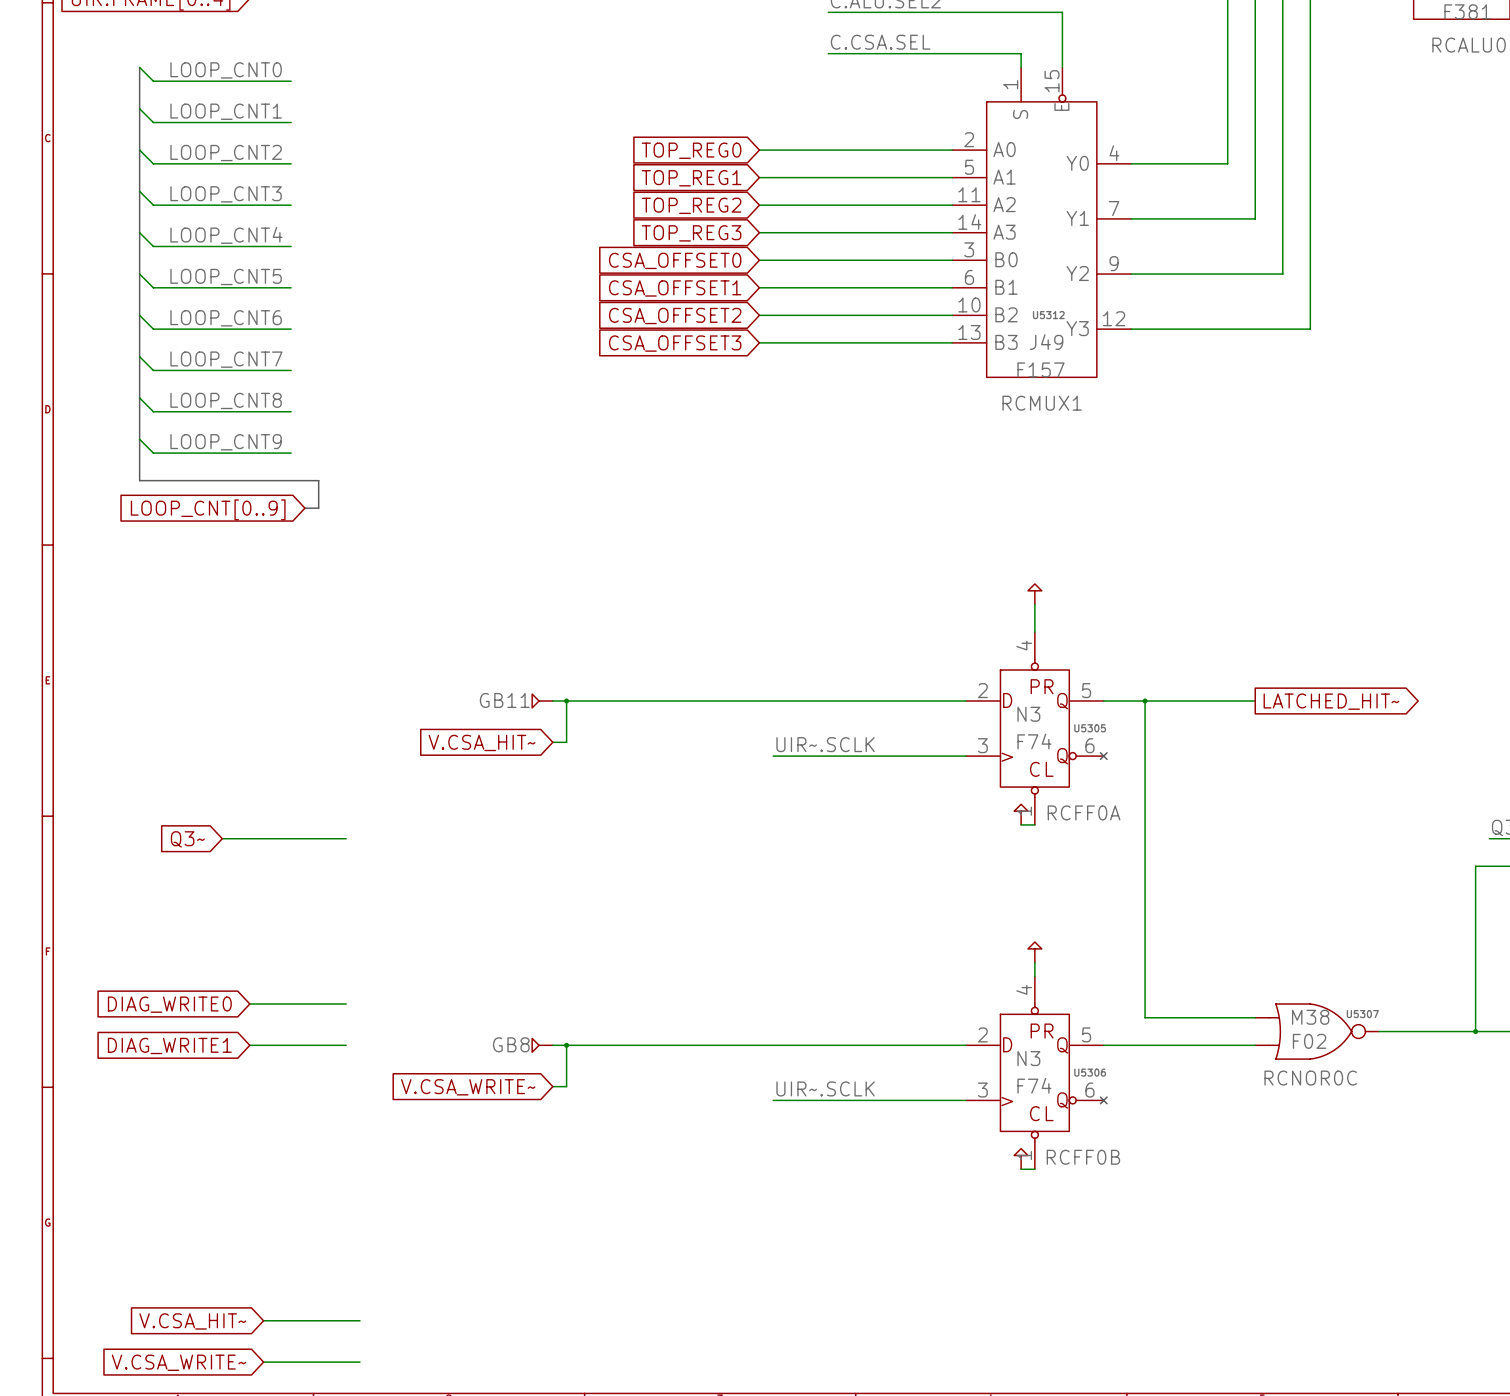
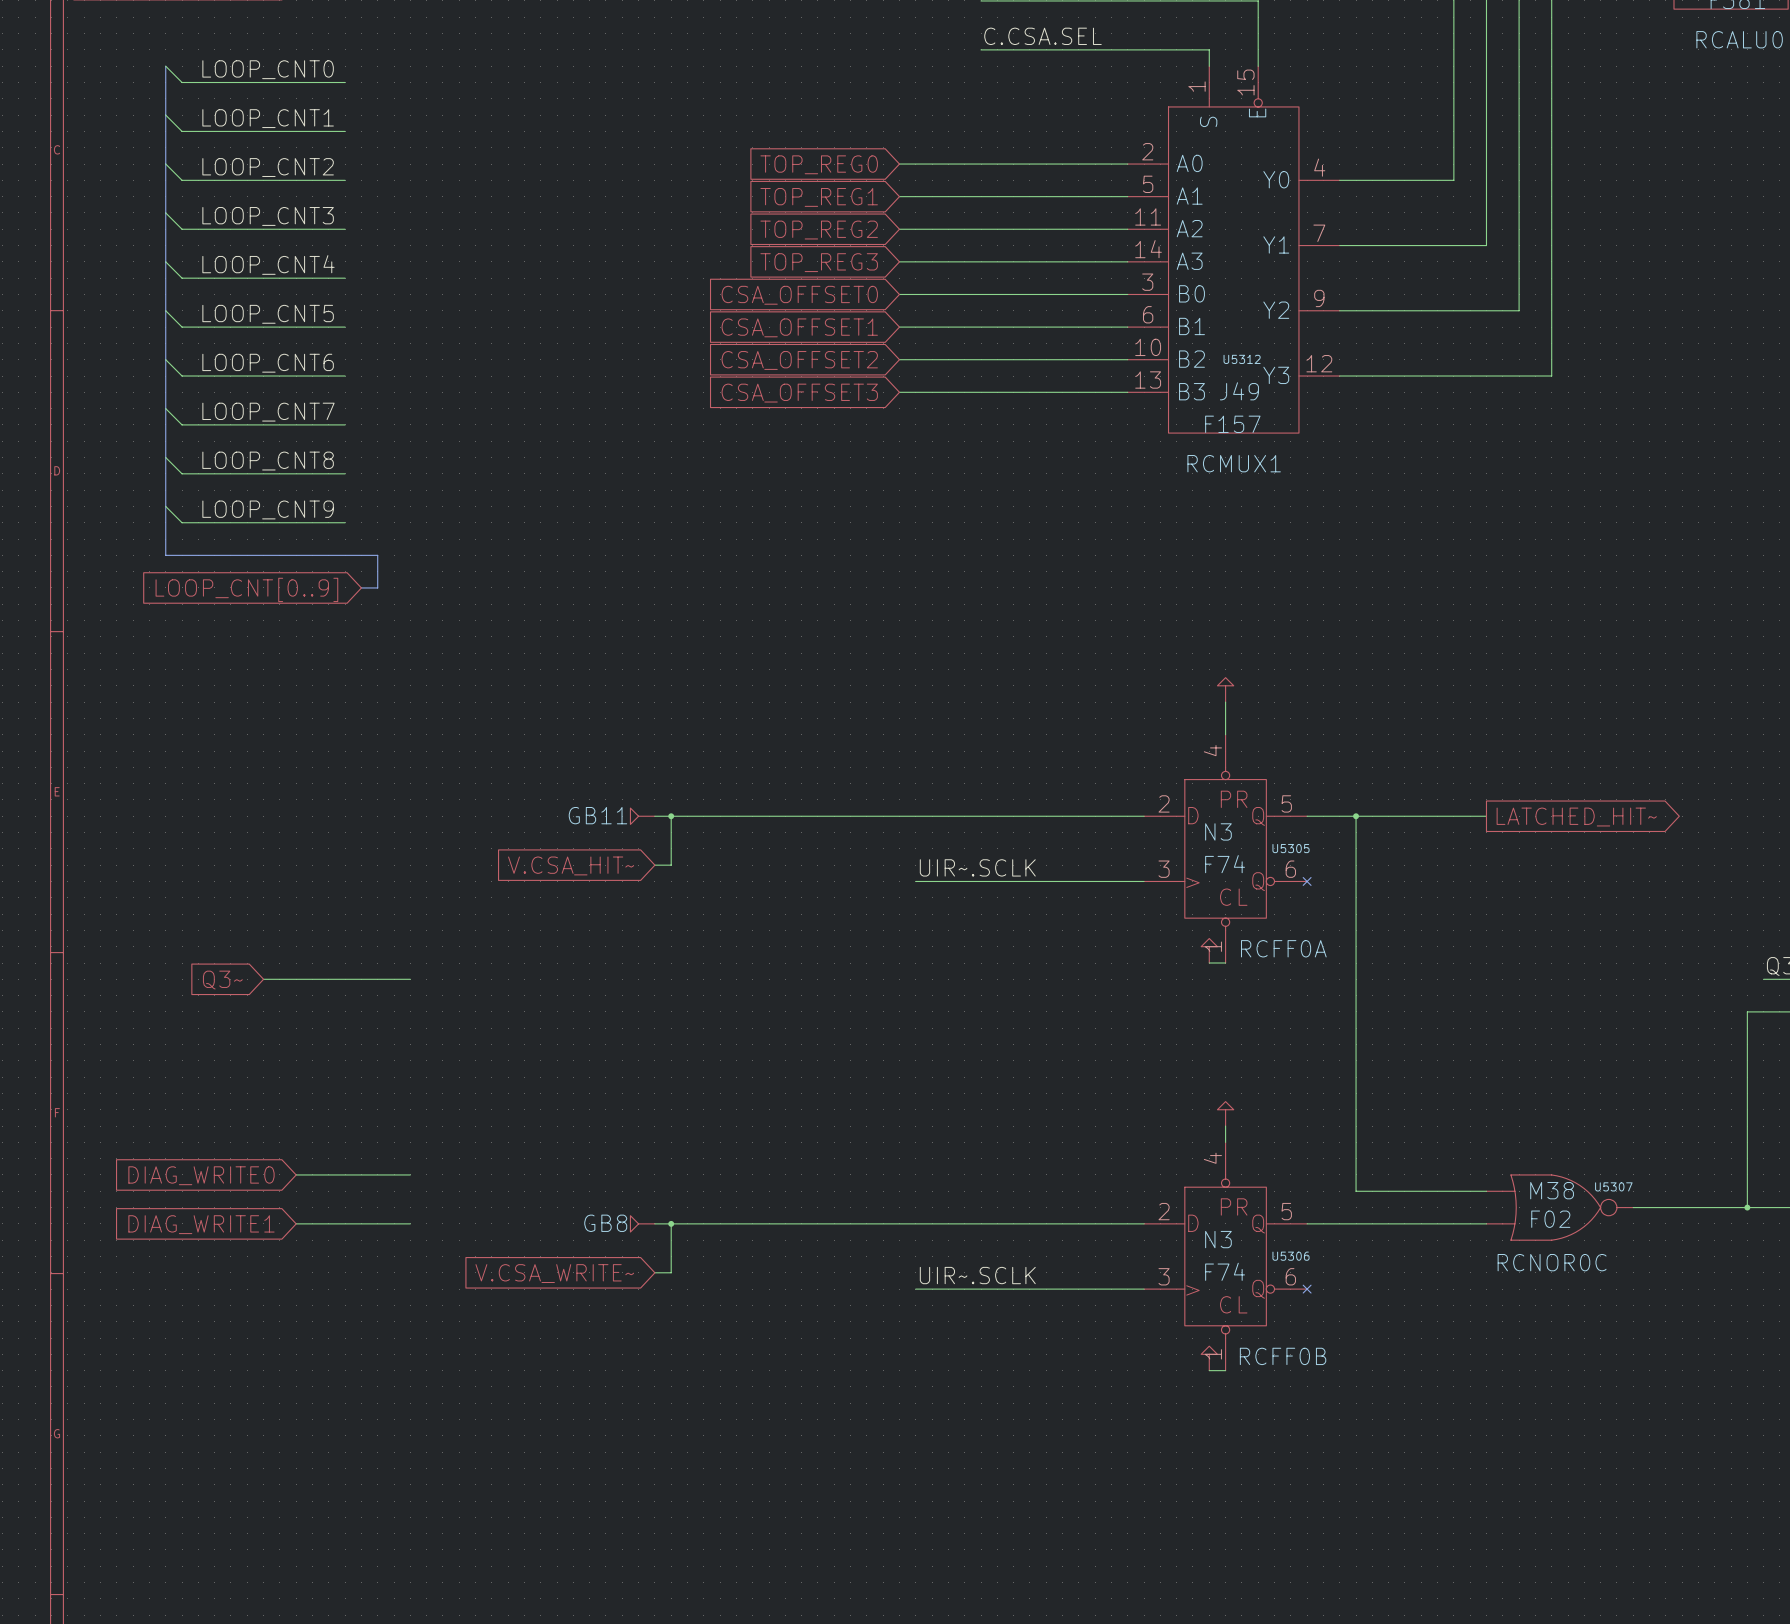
wire: (263, 1320) (360, 1320) -> none
global label: V.CSA_HIT~ (192, 1321) -> none
global label: V.CSA_WRITE~ (179, 1362) -> none
wire: (263, 1362) (360, 1362) -> none

